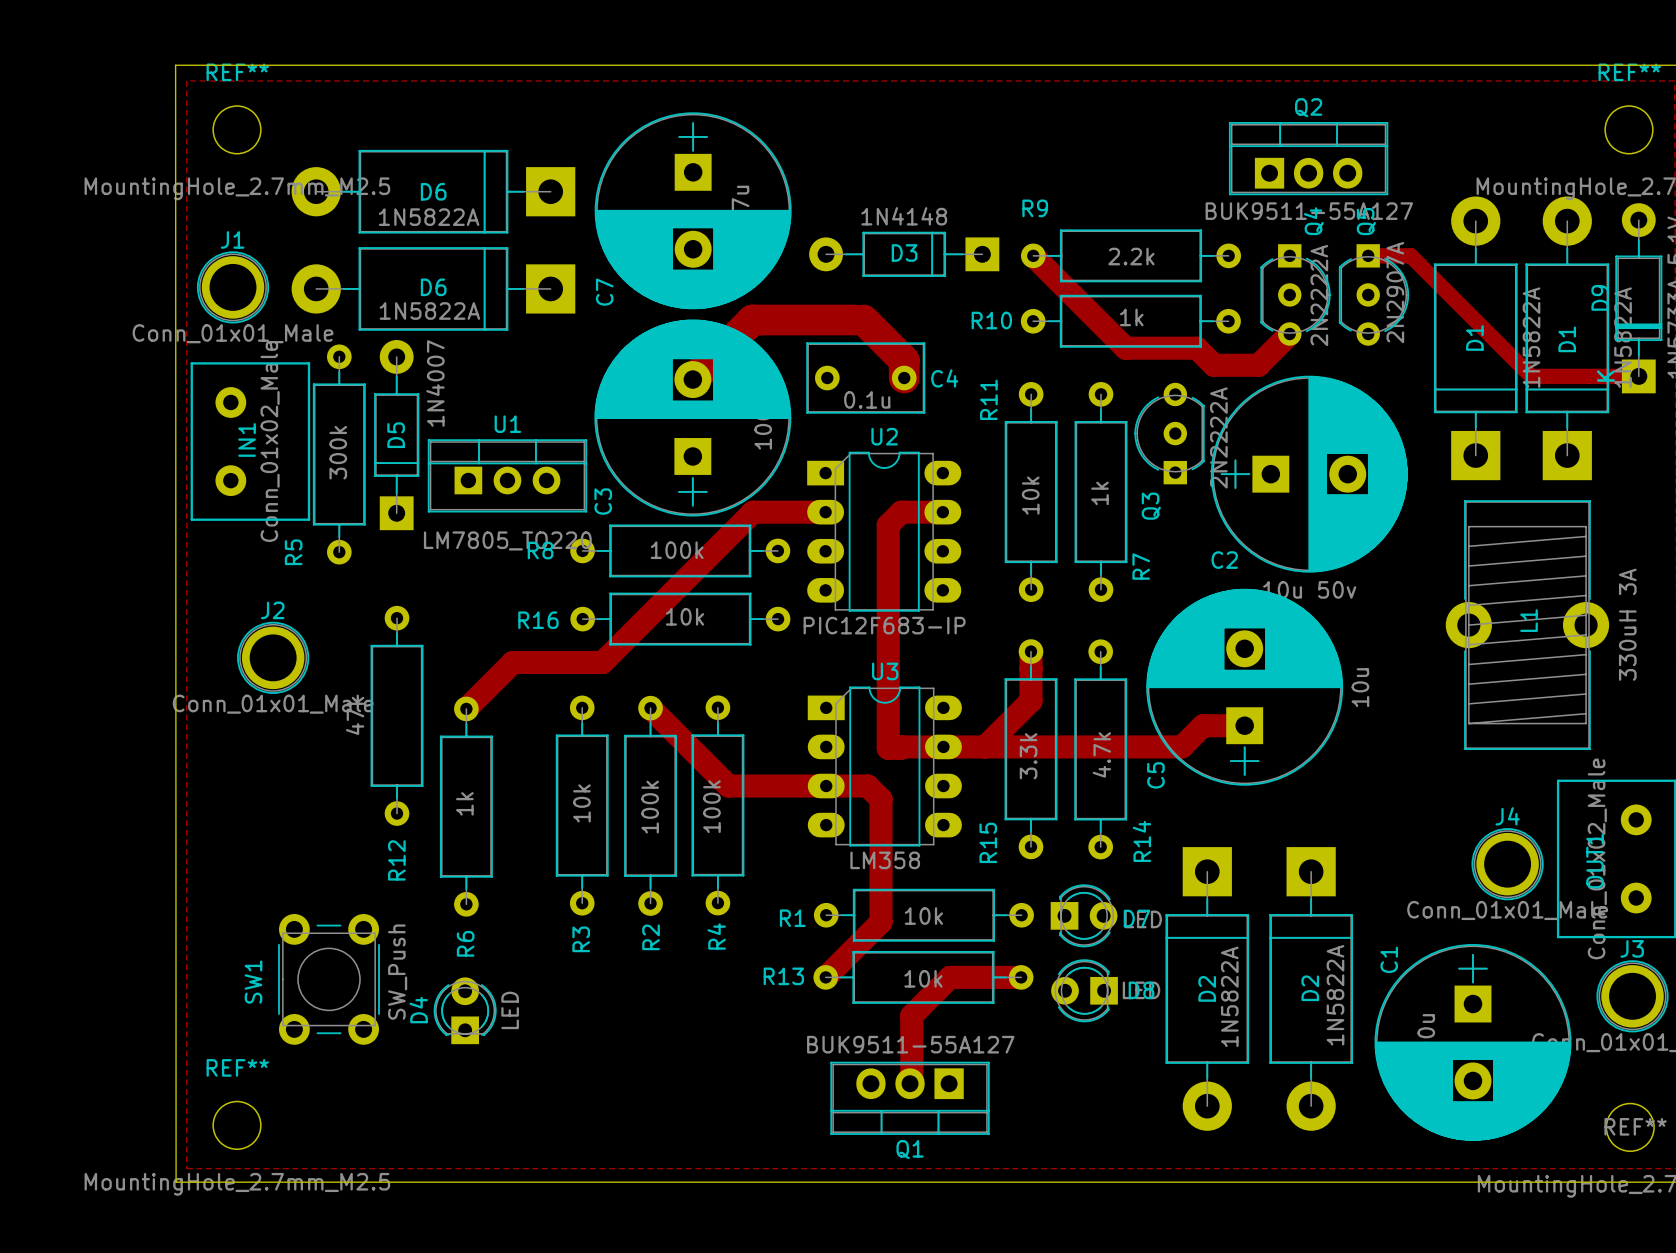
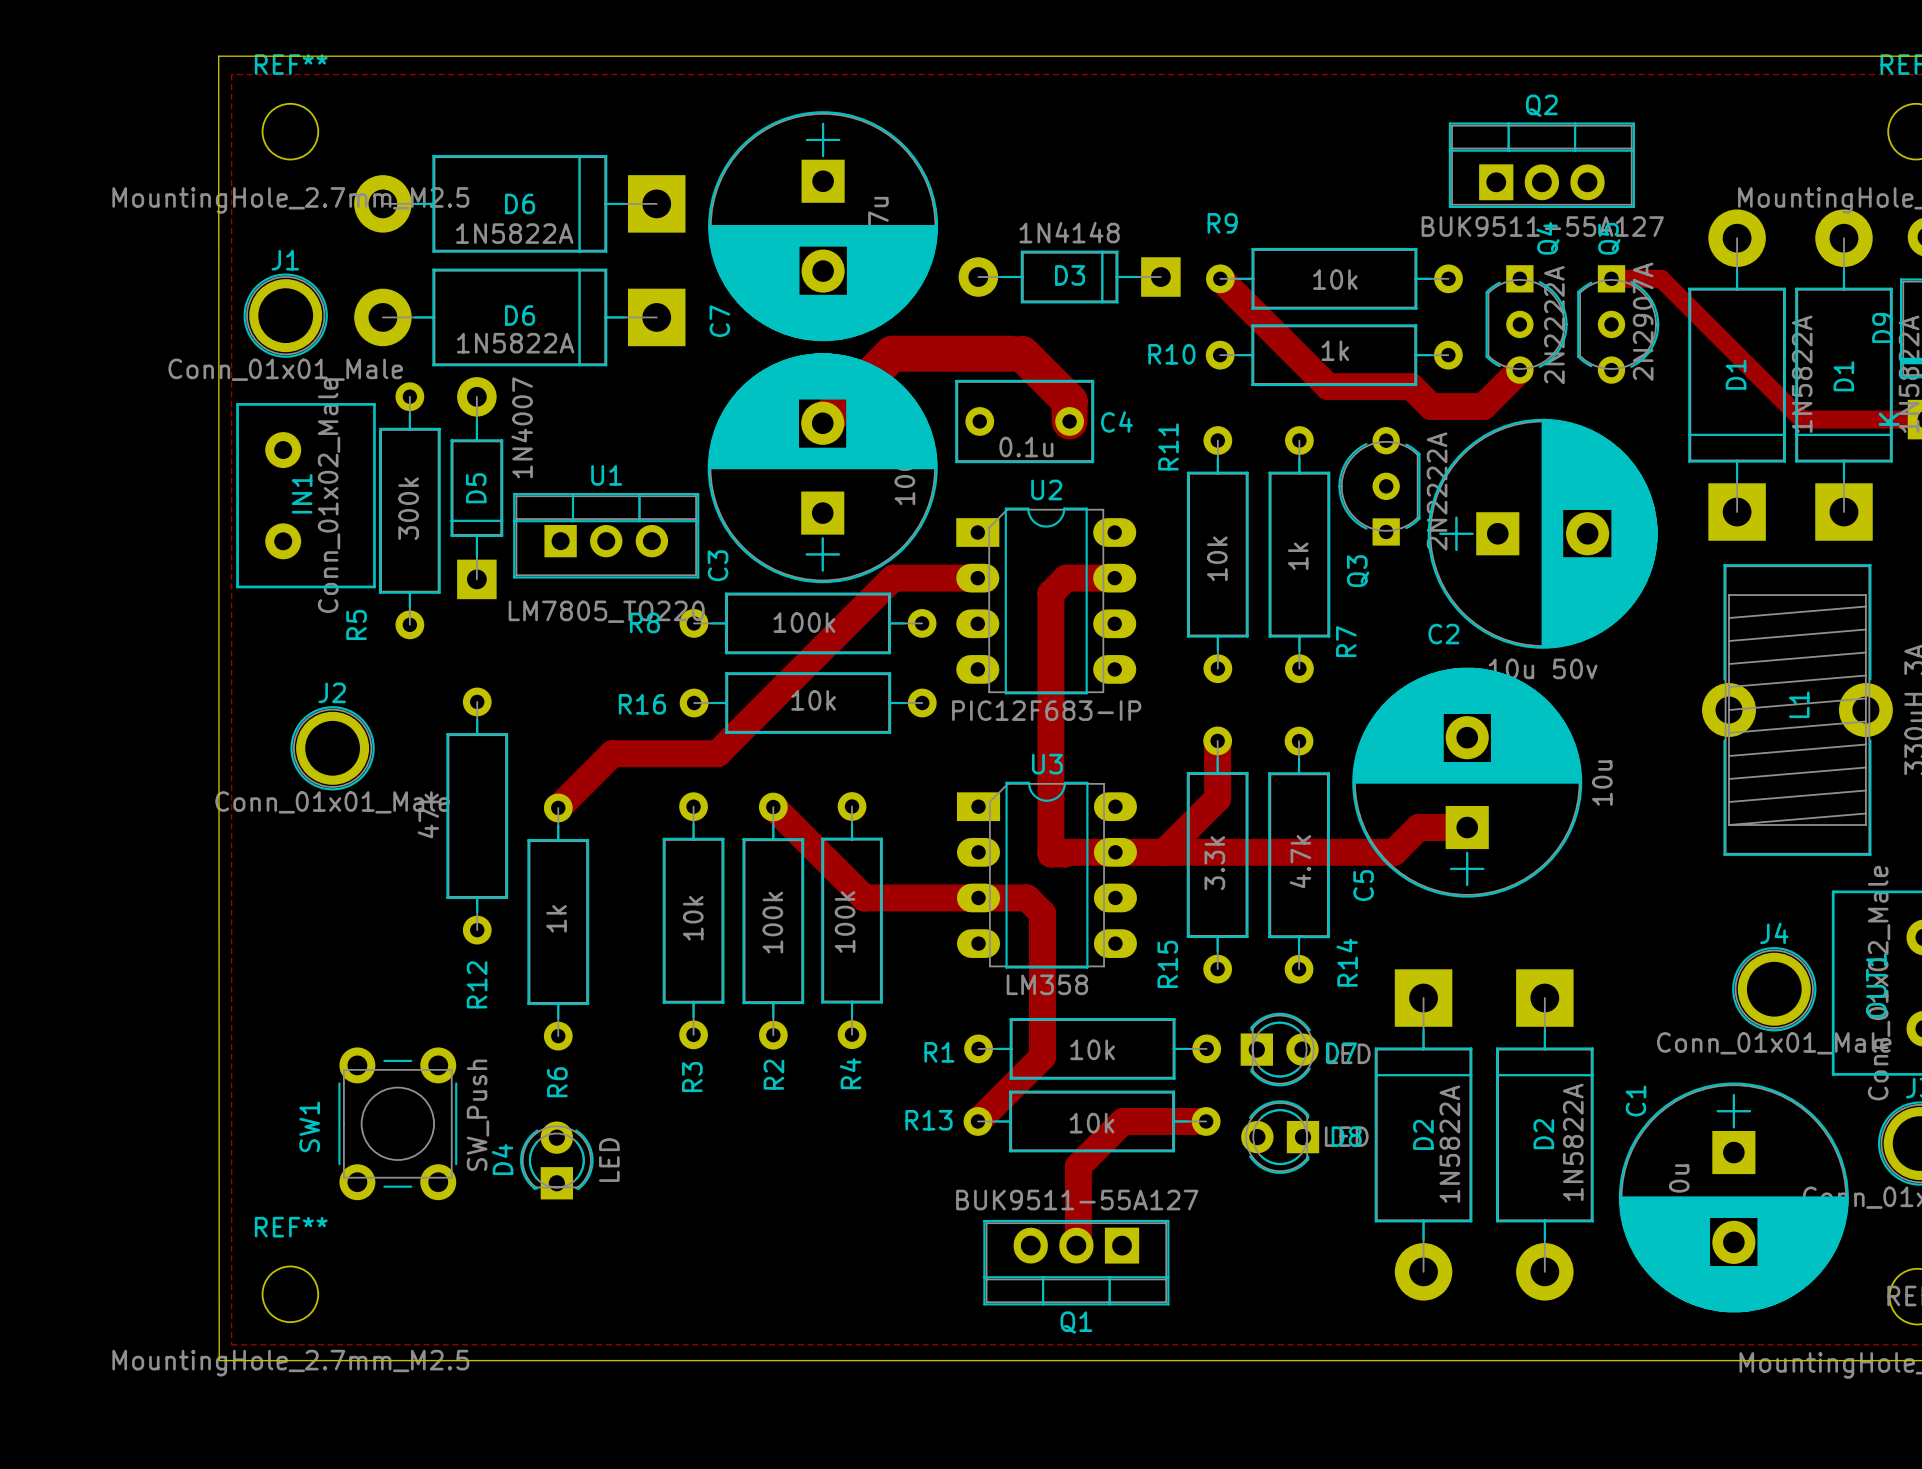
R9 value: 2.2k (1131, 256) -> 10k (1335, 279)

